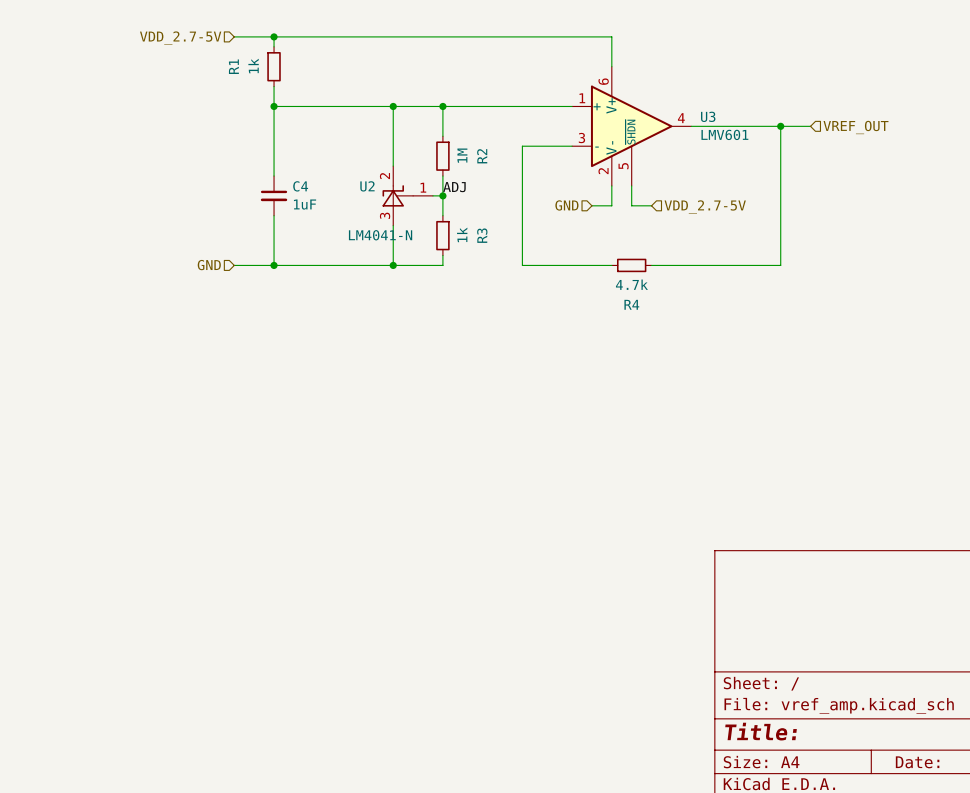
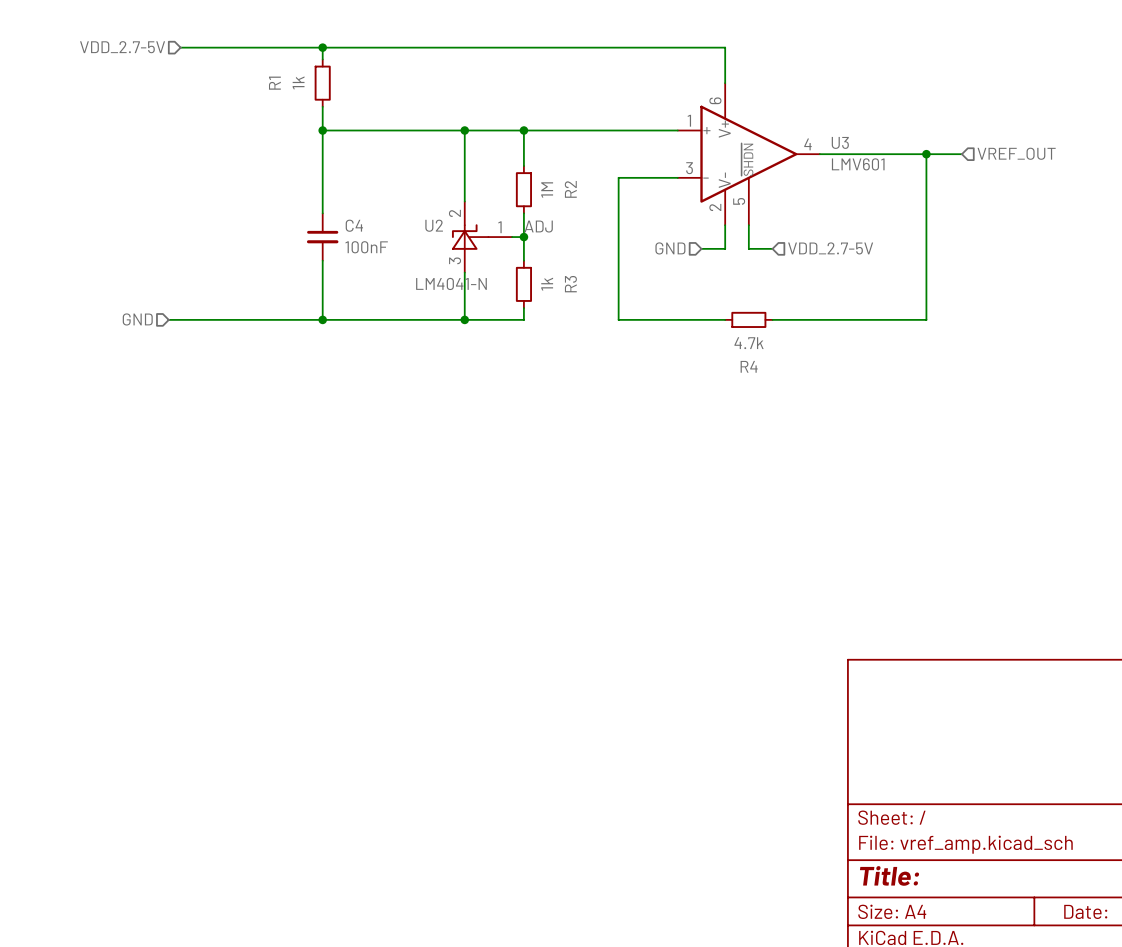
wire: none -> (180, 47) (275, 47)
hierarchical label position: VDD_2.7-5V (180, 38) -> VDD_2.7-5V (122, 47)
C4 value: 1uF (305, 204) -> 100nF (366, 247)
wire: none -> (168, 319) (275, 319)
hierarchical label position: GND (209, 265) -> GND (137, 319)

